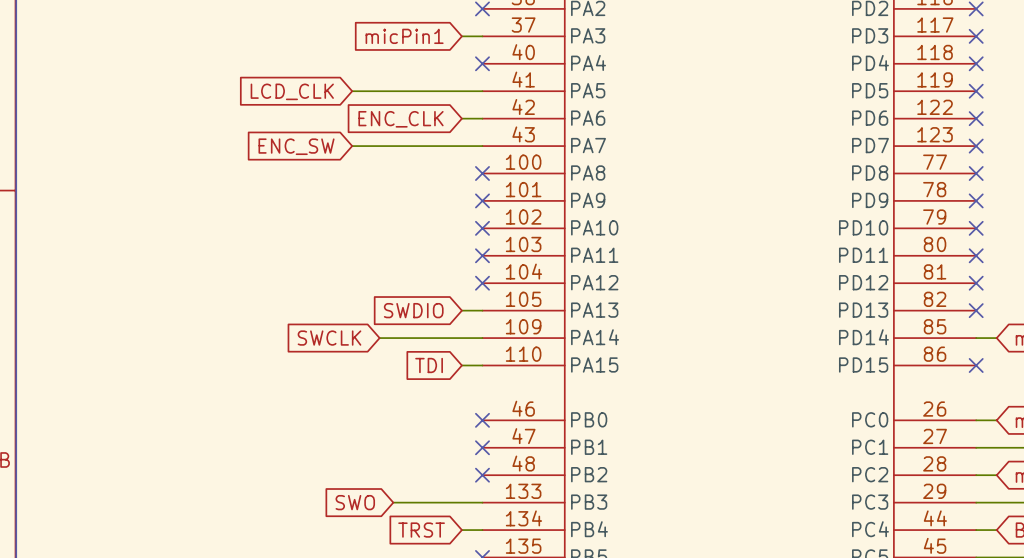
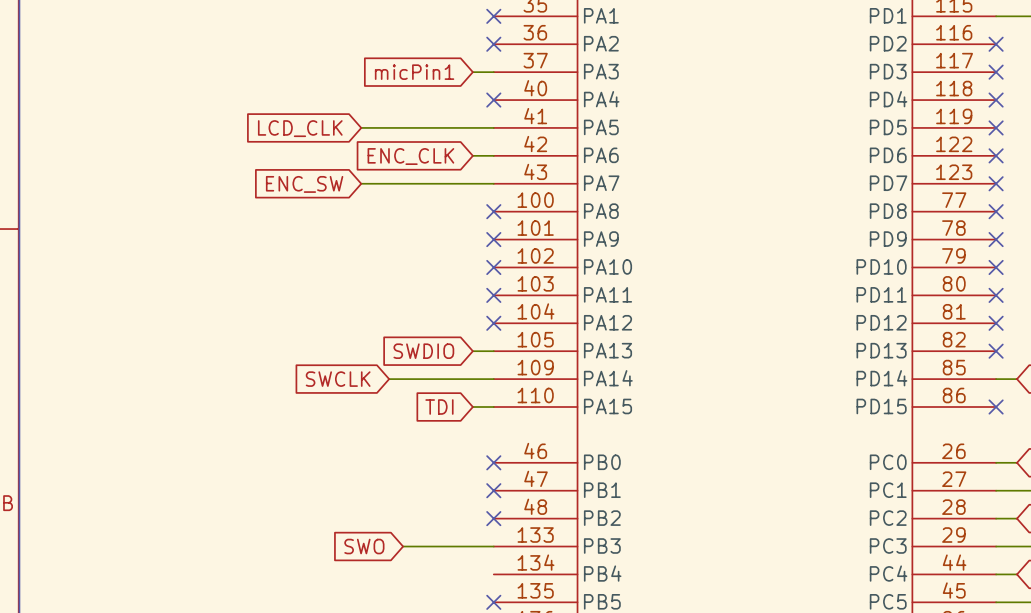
global label: TRST (421, 530) -> none
wire: (461, 530) (482, 530) -> none

